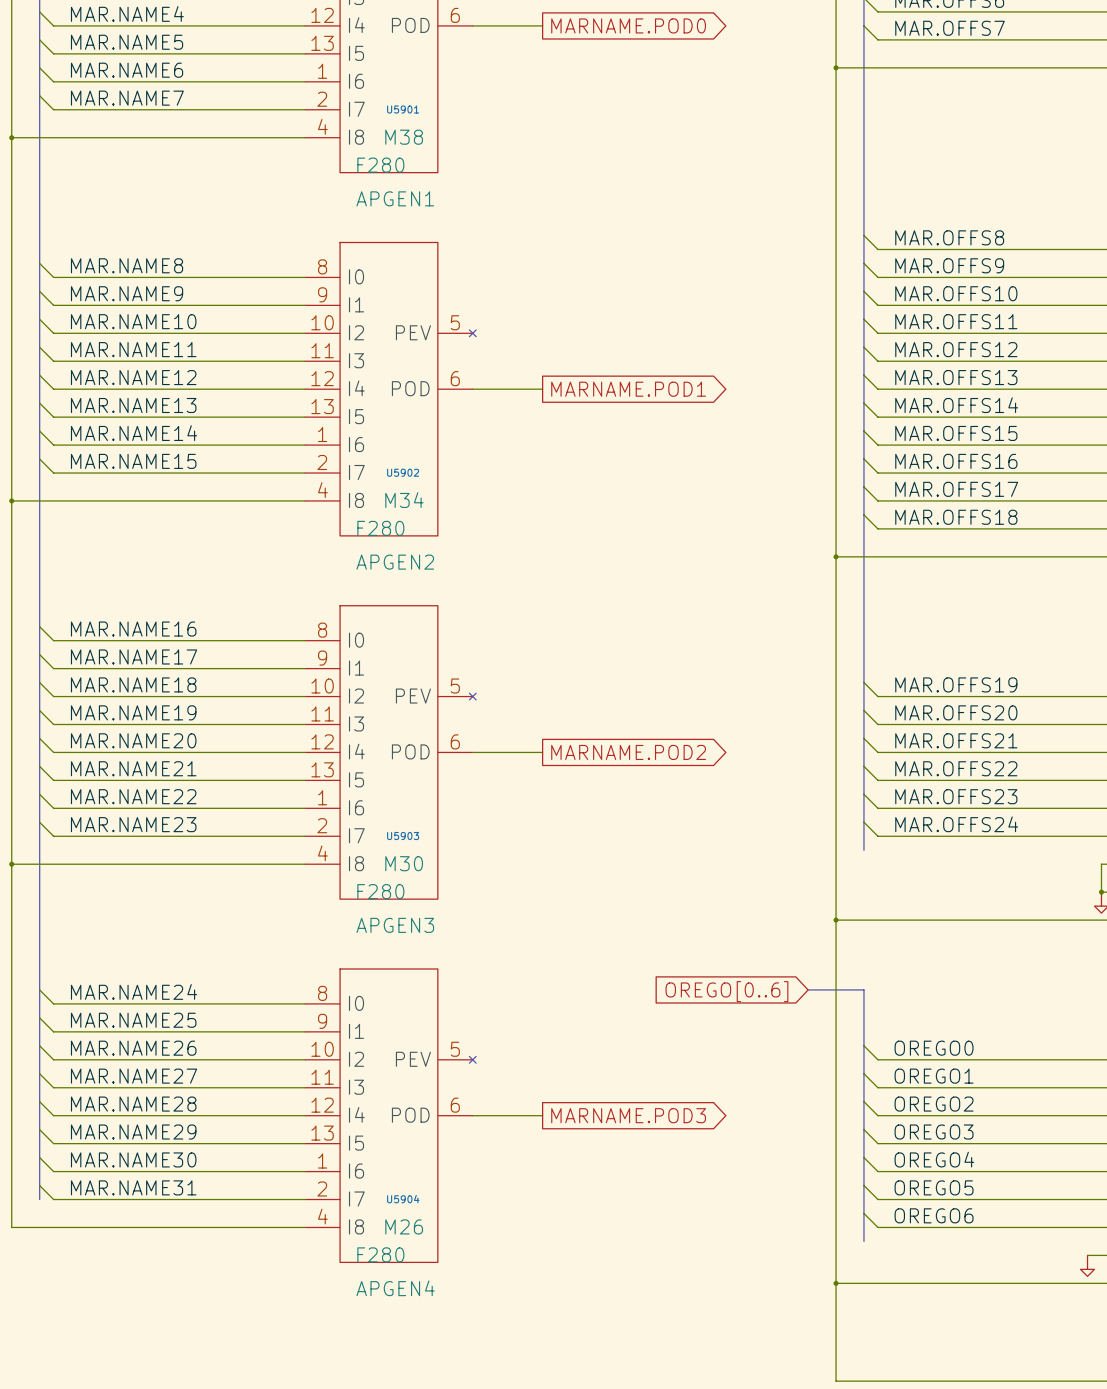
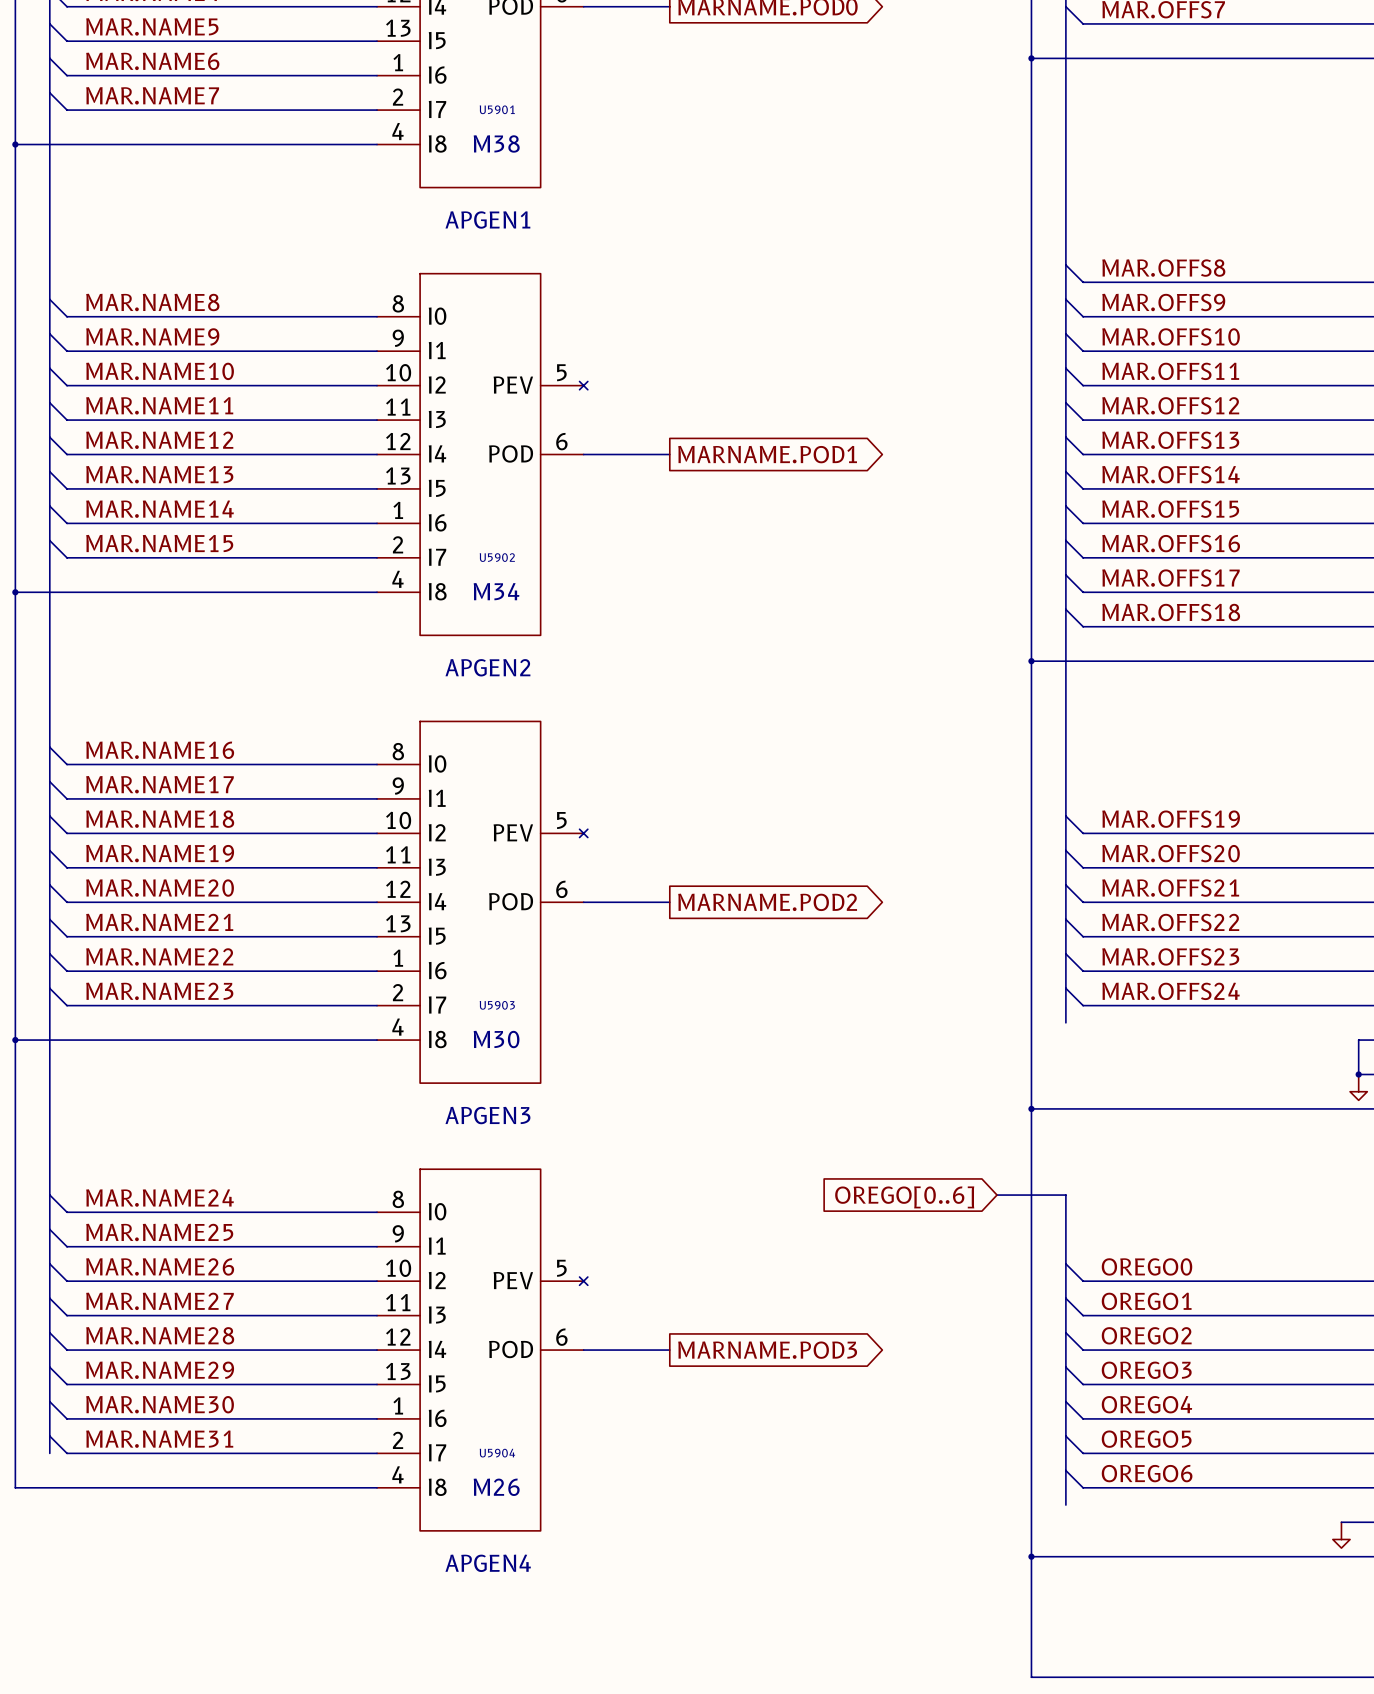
U5901 value: F280 (380, 165) -> none
U5902 value: F280 (380, 528) -> none
U5903 value: F280 (380, 891) -> none
U5904 value: F280 (380, 1254) -> none

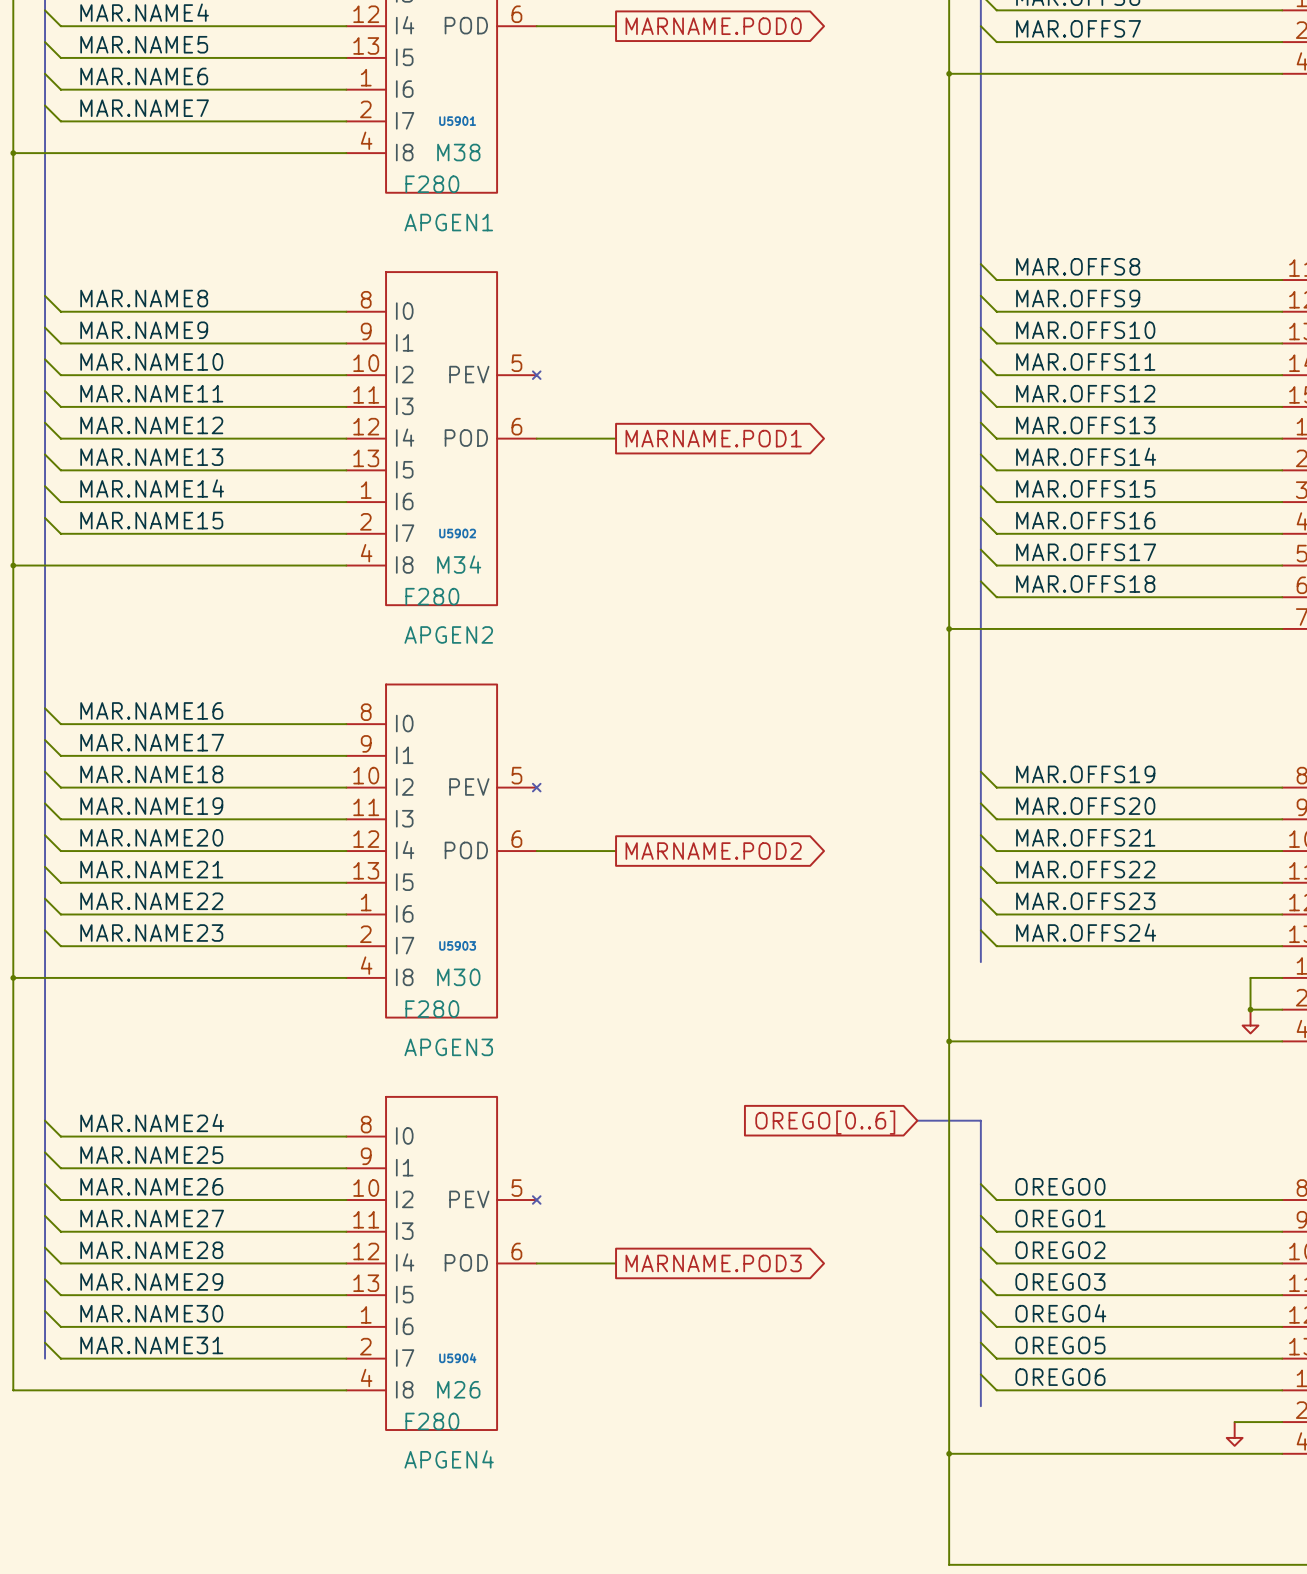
U5901 value: none -> F280 (432, 184)
U5902 value: none -> F280 (432, 596)
U5903 value: none -> F280 (432, 1009)
U5904 value: none -> F280 (432, 1421)

